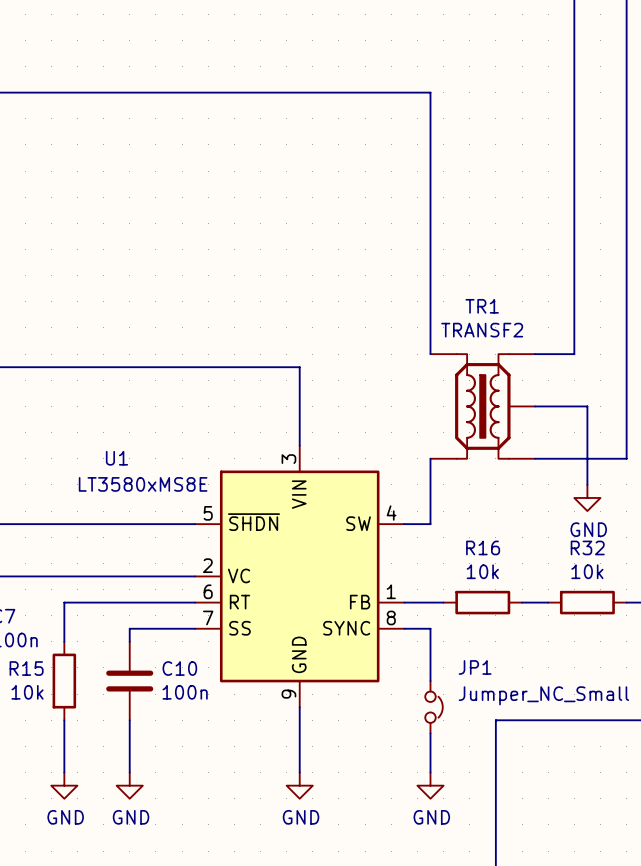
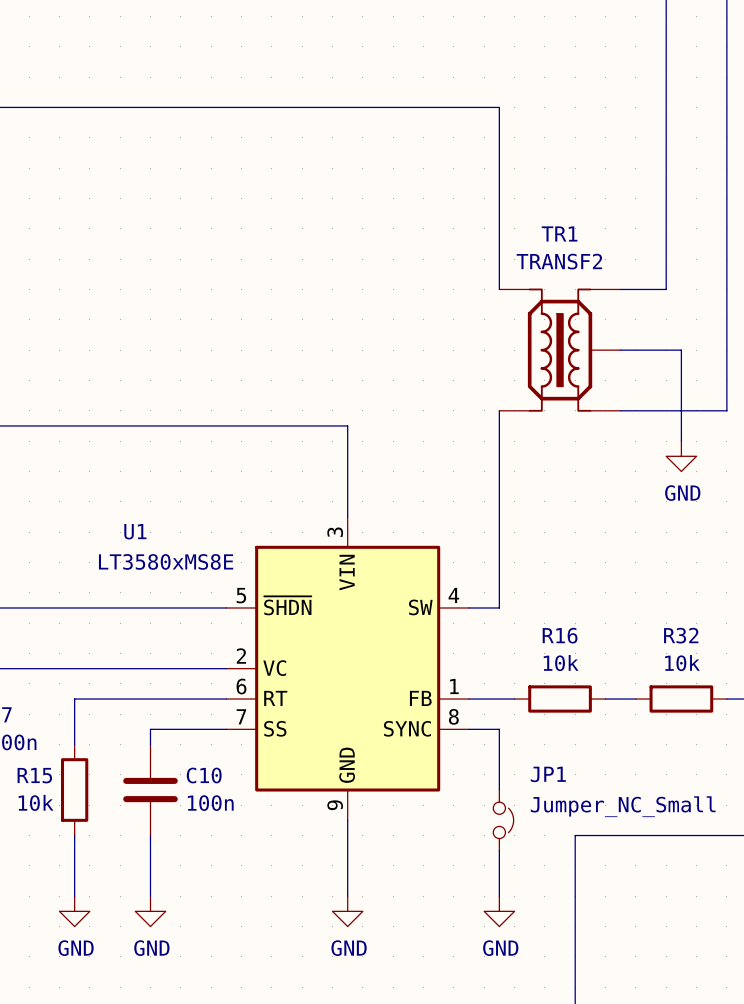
wire: (430, 249) (430, 354) -> (499, 532) (499, 410)
wire: (574, 249) (574, 354) -> (666, 289) (620, 289)
wire: (626, 354) (626, 458) (535, 458) -> (726, 410) (666, 410)
TR1 position: (482, 406) -> (560, 350)
wire: (535, 406) (587, 406) (587, 484) -> (620, 350) (681, 350) (681, 441)
power symbol position: GND (587, 497) -> GND (681, 456)

